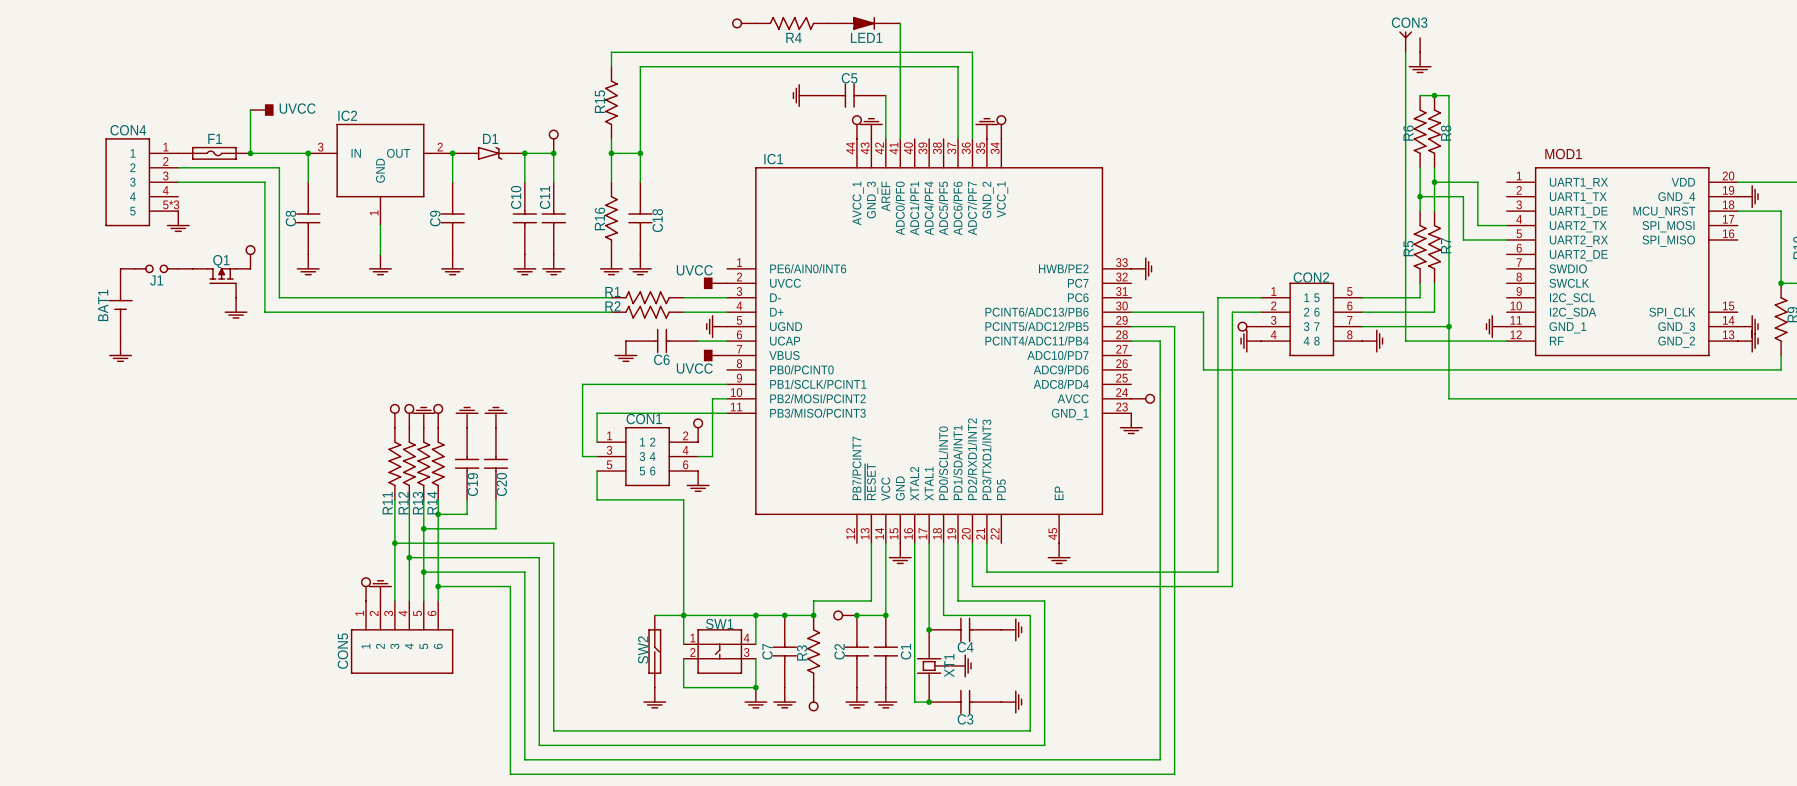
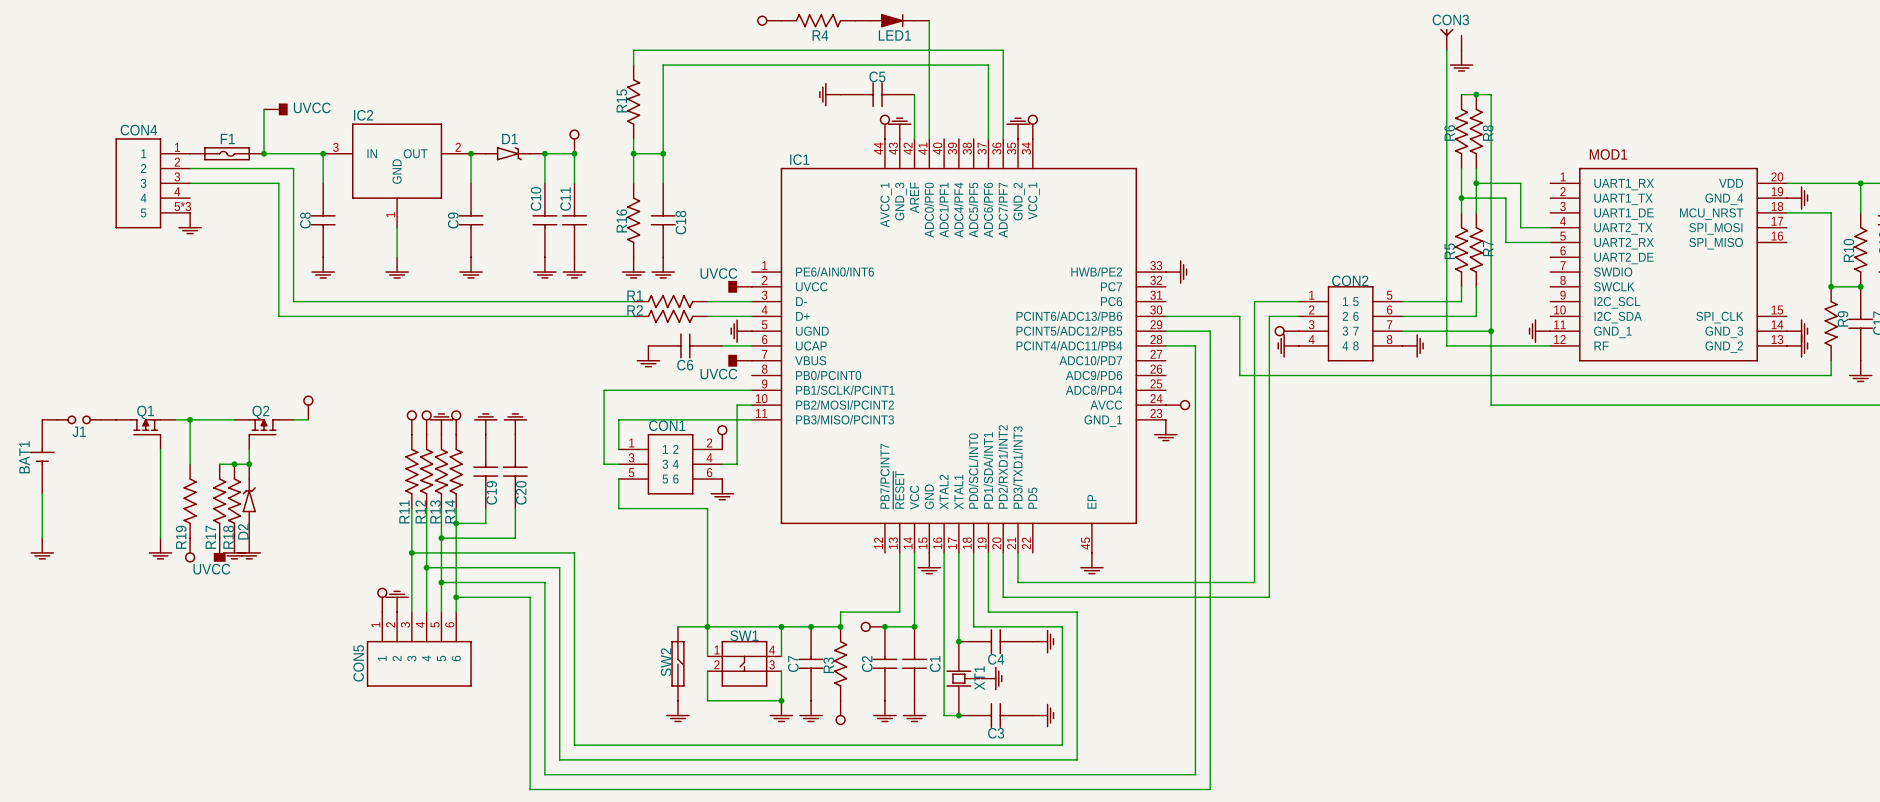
power symbol: (250, 256) -> none
J1 position: (156, 268) -> (79, 419)
Q1 position: (221, 282) -> (145, 434)
BAT1 position: (120, 304) -> (42, 456)
power symbol: (236, 308) -> none
power symbol: (120, 351) -> none
power symbol: none -> (308, 407)
wire: none -> (175, 419) (234, 419)
wire: none -> (190, 419) (190, 464)
junction: none -> (190, 419)
wire: none -> (293, 419) (308, 419)
Q2: none -> (264, 434)
wire: none -> (160, 449) (160, 538)
wire: none -> (249, 449) (249, 464) (219, 464)
junction: none -> (234, 464)
junction: none -> (249, 464)
wire: none -> (42, 493) (42, 538)
R19: none -> (190, 501)
R17: none -> (219, 501)
R18: none -> (234, 501)
D2: none -> (249, 501)
power symbol: none -> (42, 548)
power symbol: none -> (160, 548)
power symbol: none -> (234, 548)
power symbol: none -> (249, 548)
power symbol: none -> (190, 550)
power symbol: none -> UVCC (219, 549)

